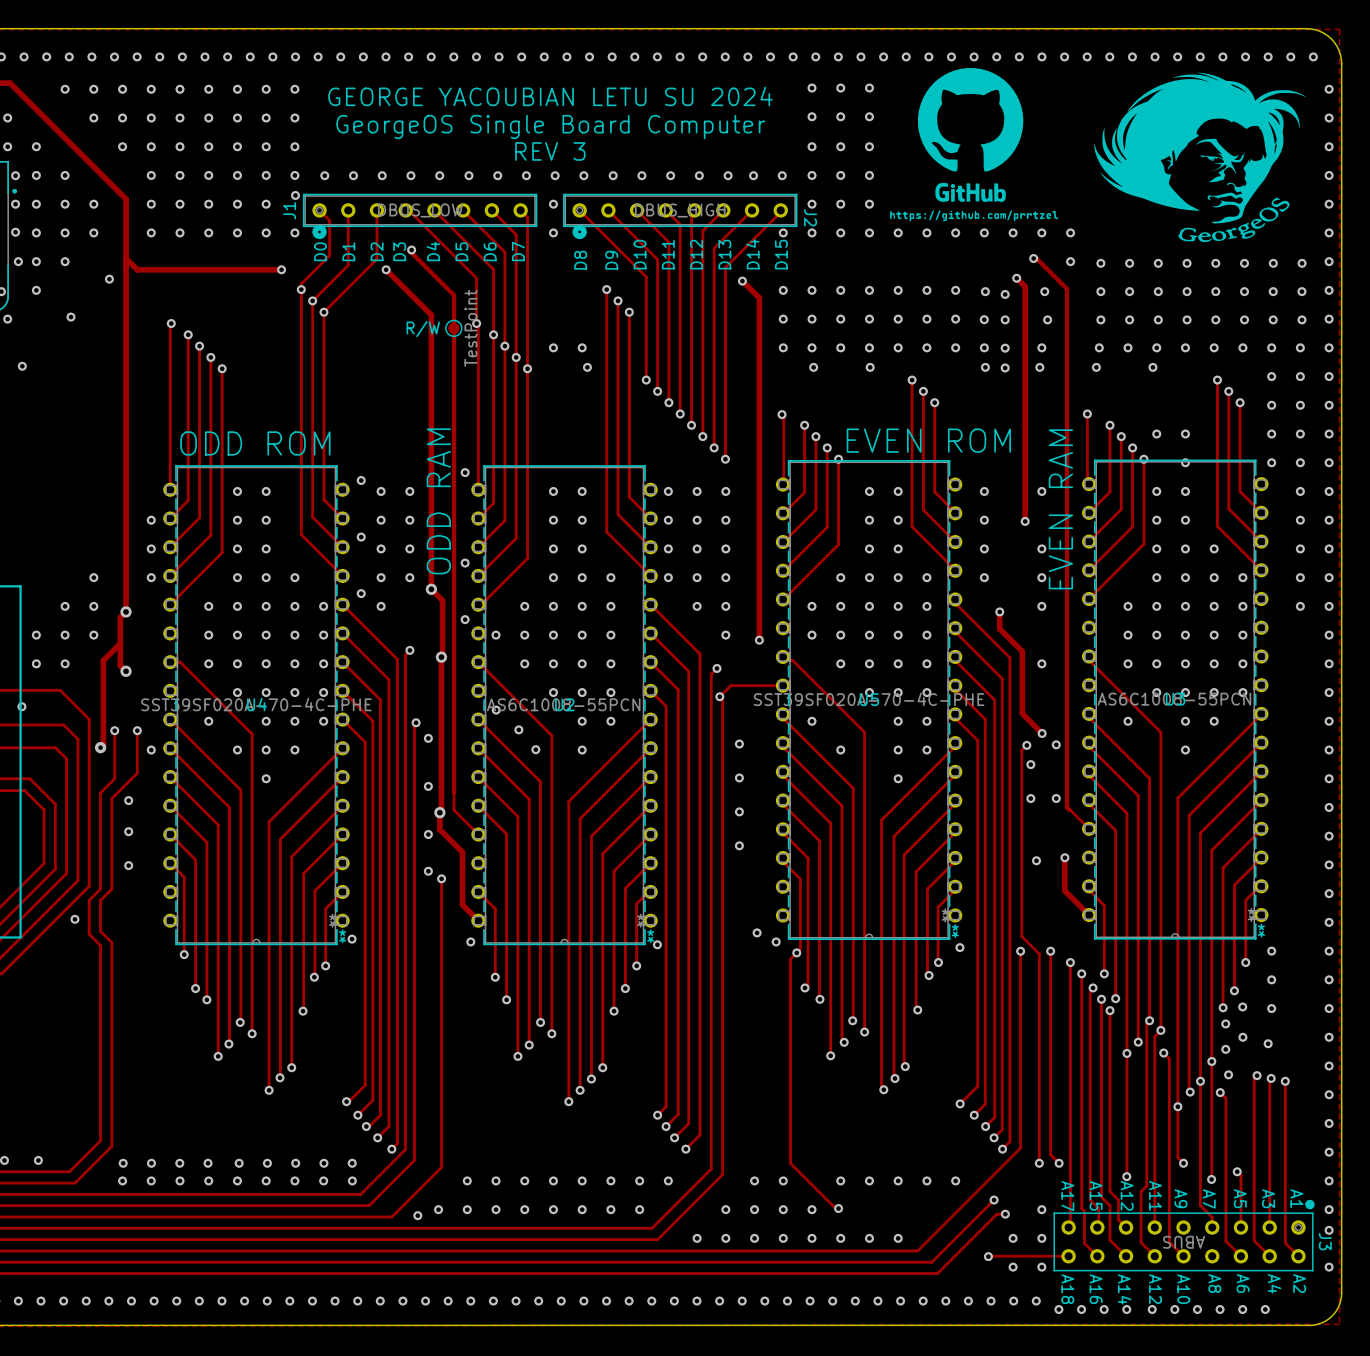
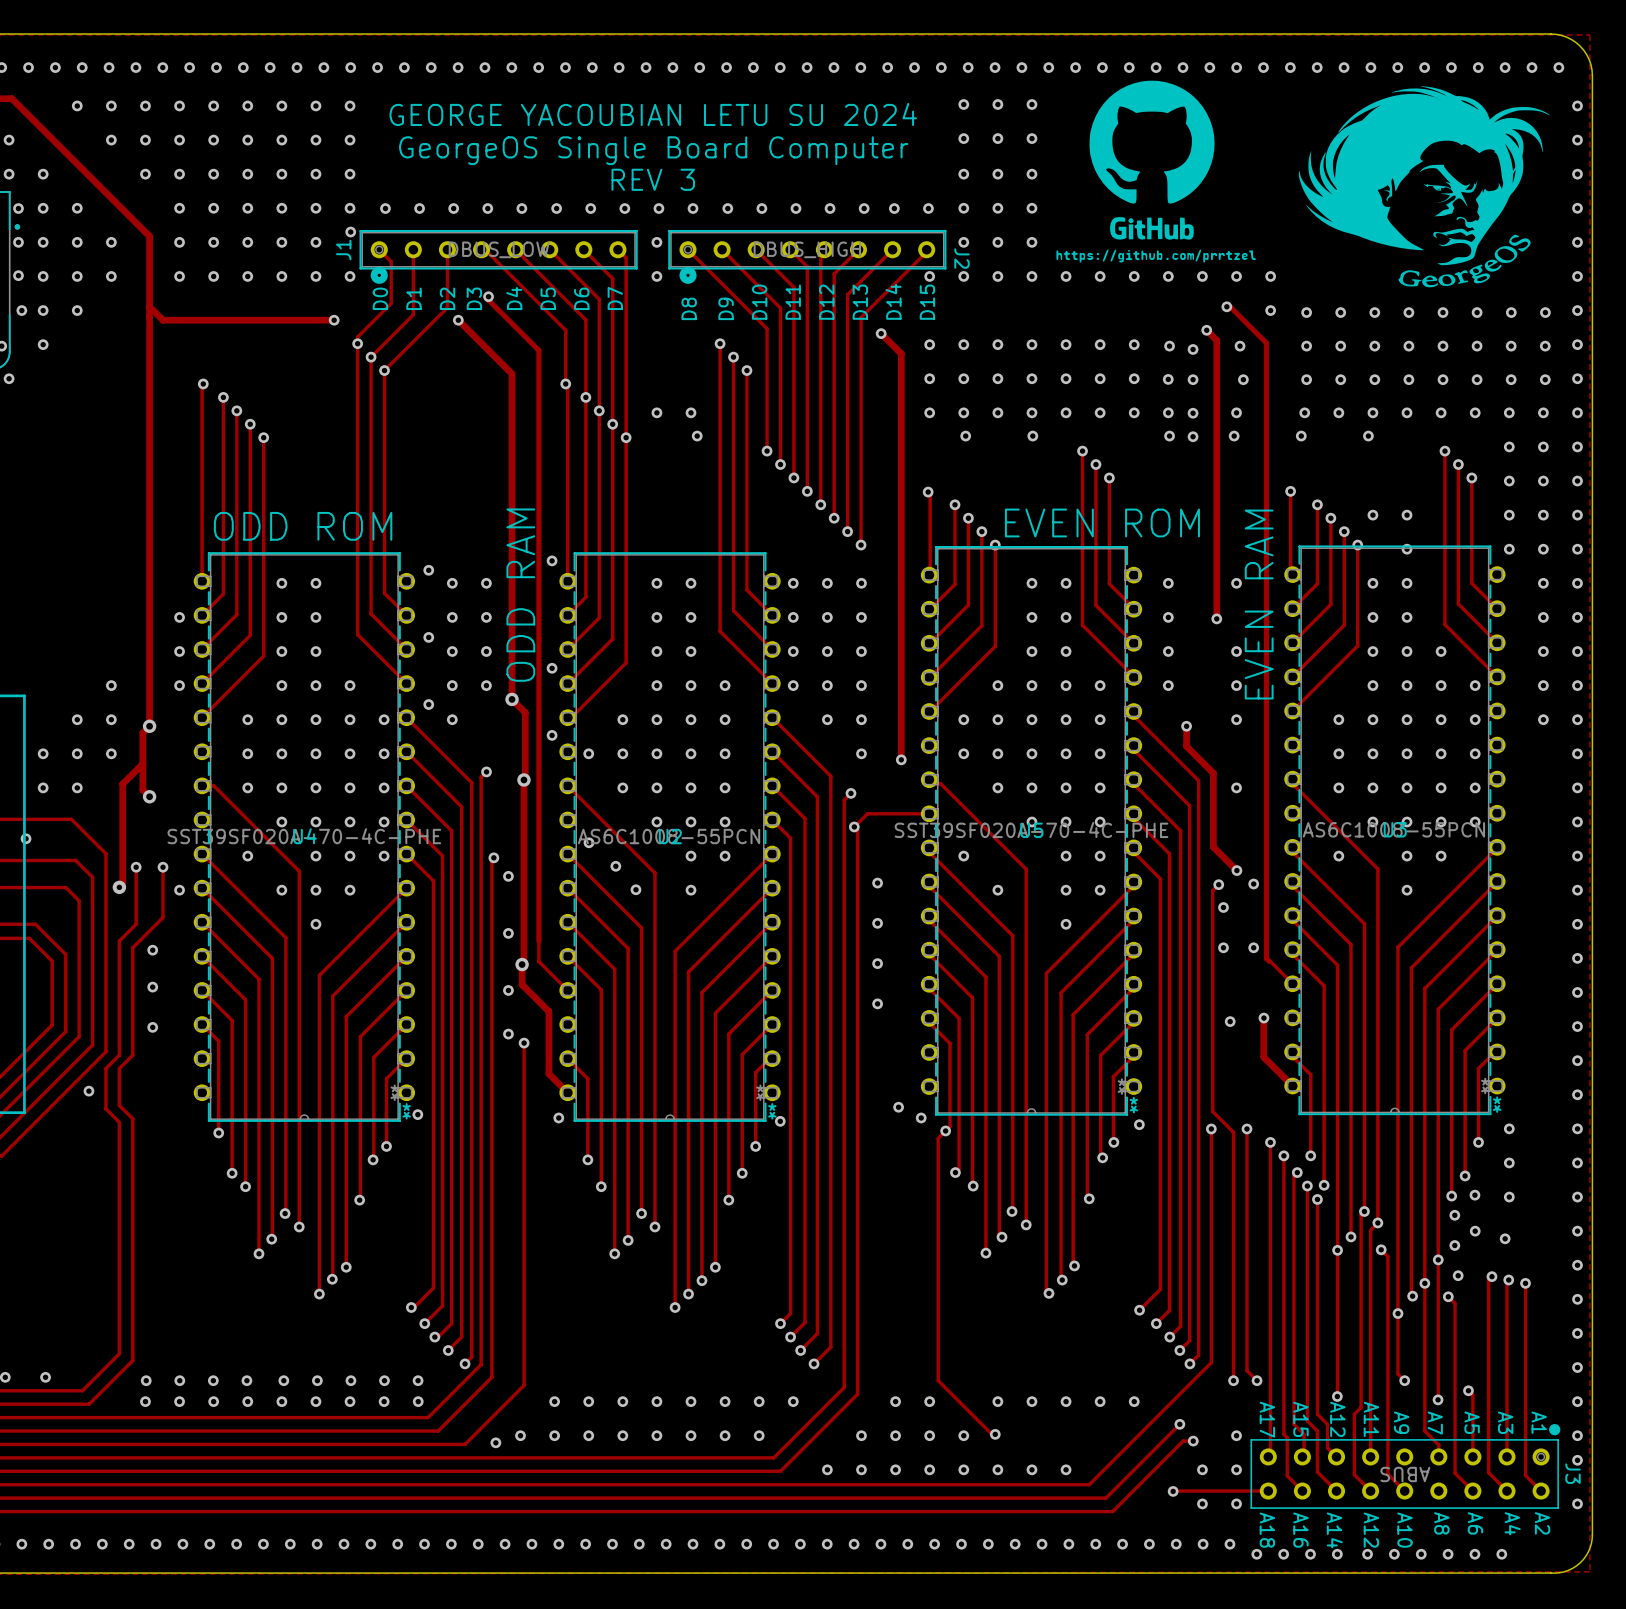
via: (109, 279) -> none
via: (70, 317) -> none
R/W: TestPoint (453, 328) -> none
via: (22, 366) -> none

